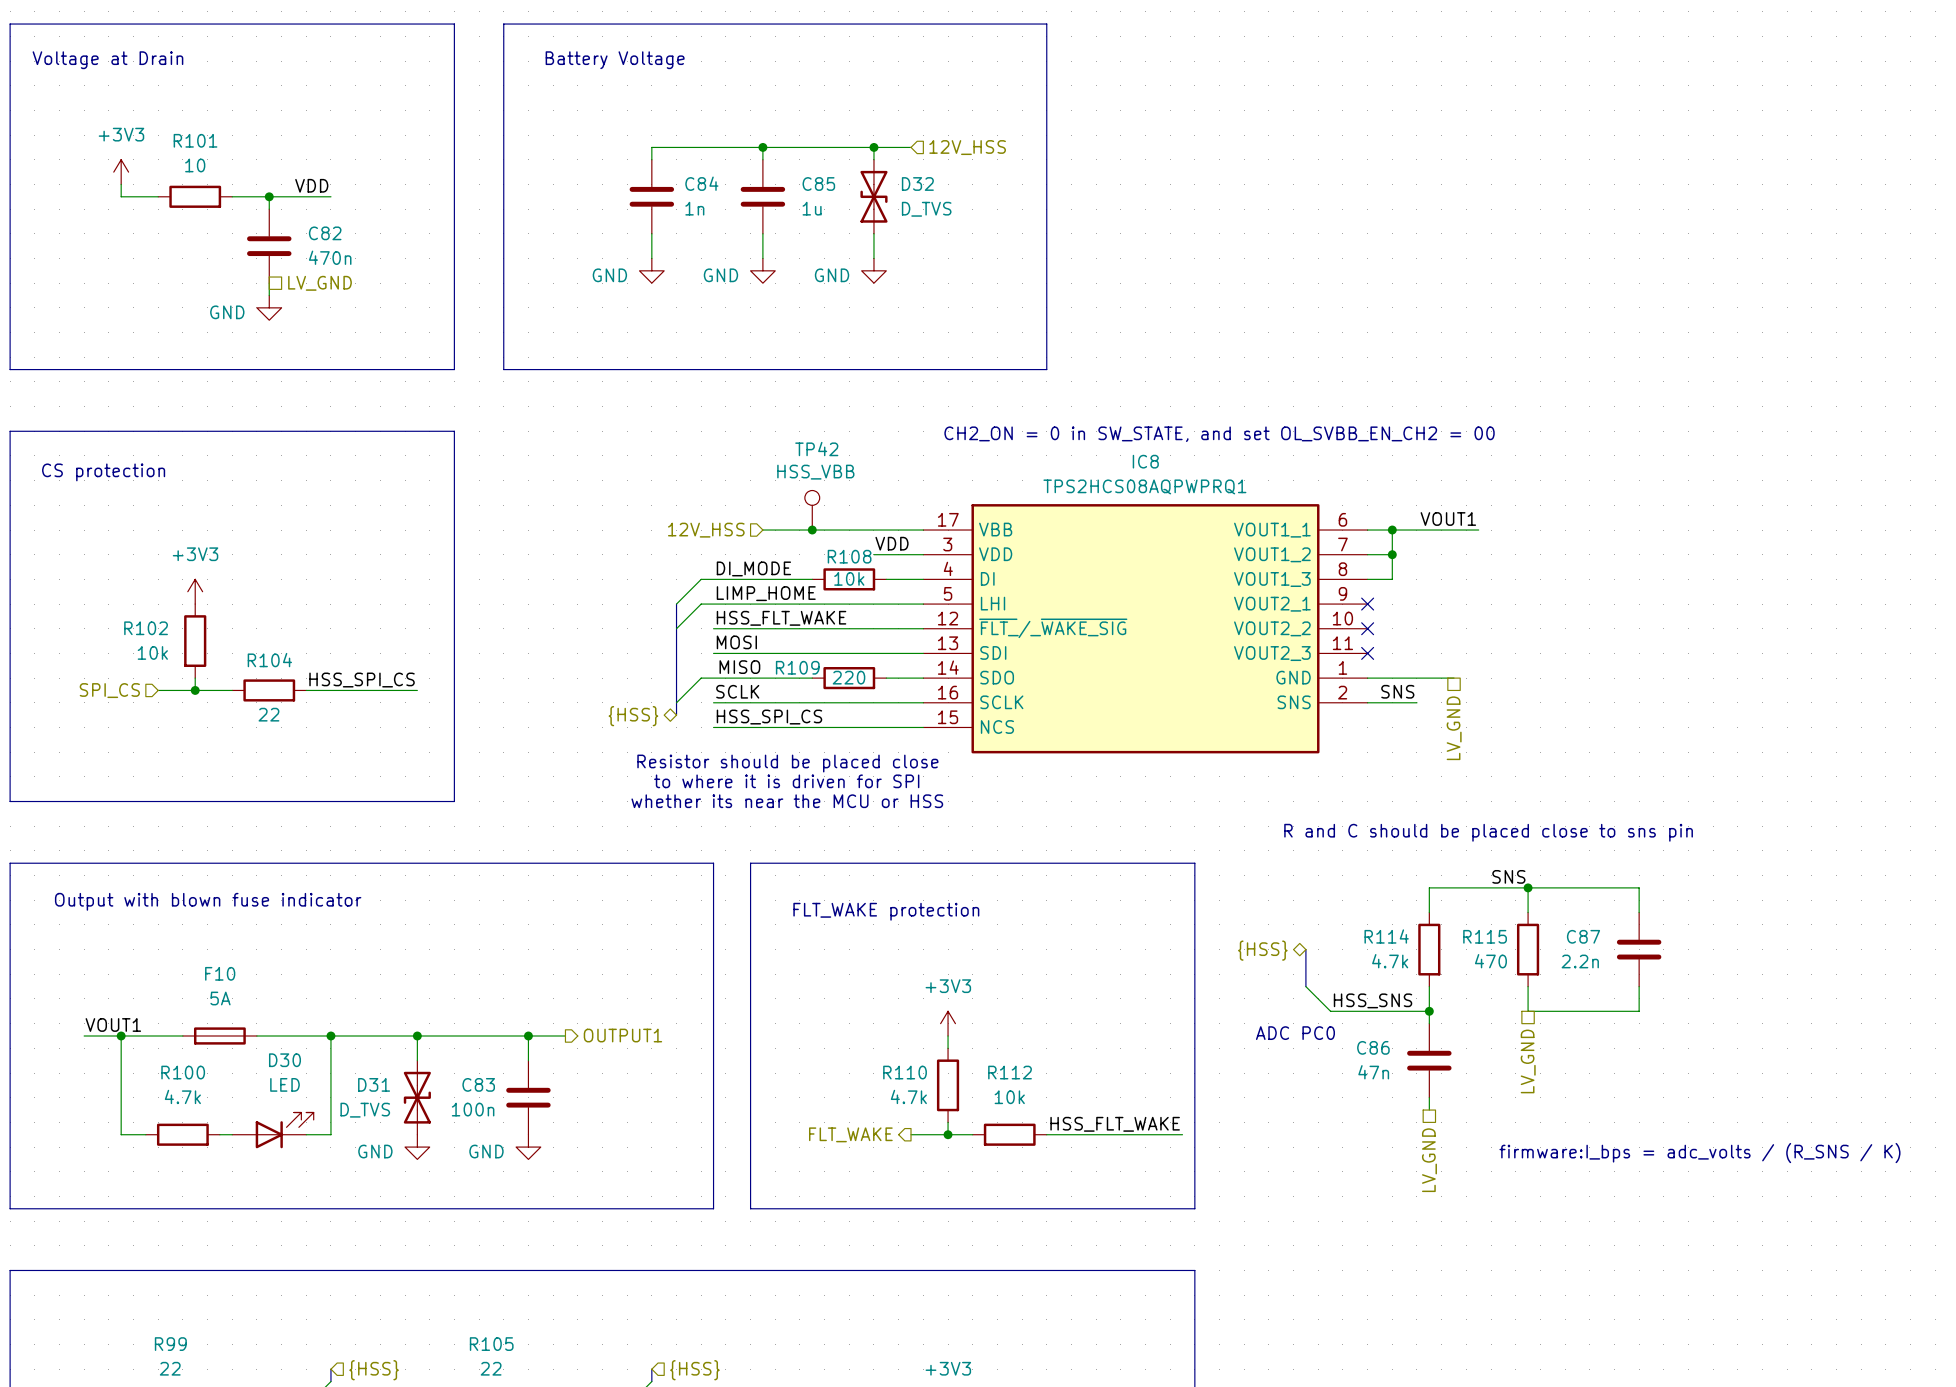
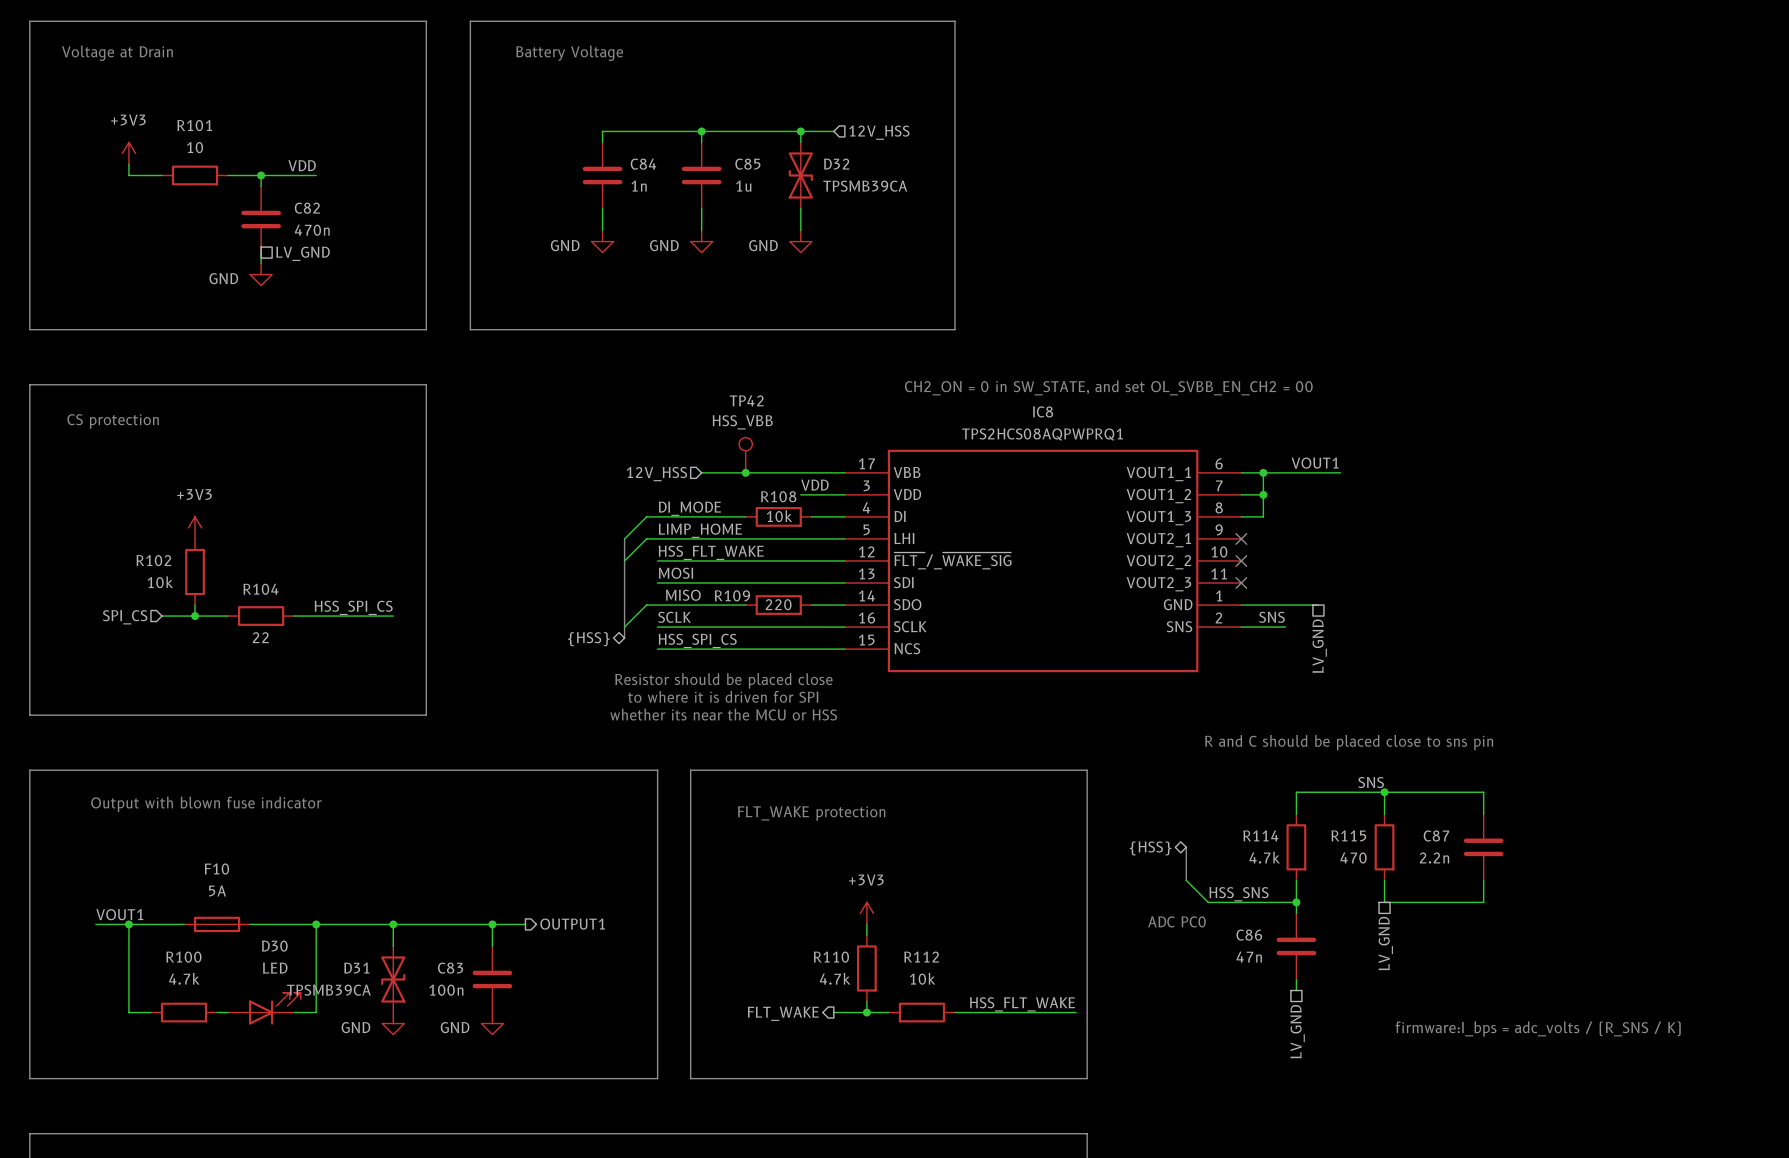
D32 value: D_TVS (926, 209) -> TPSMB39CA (865, 186)
D31 value: D_TVS (365, 1110) -> TPSMB39CA (328, 990)

